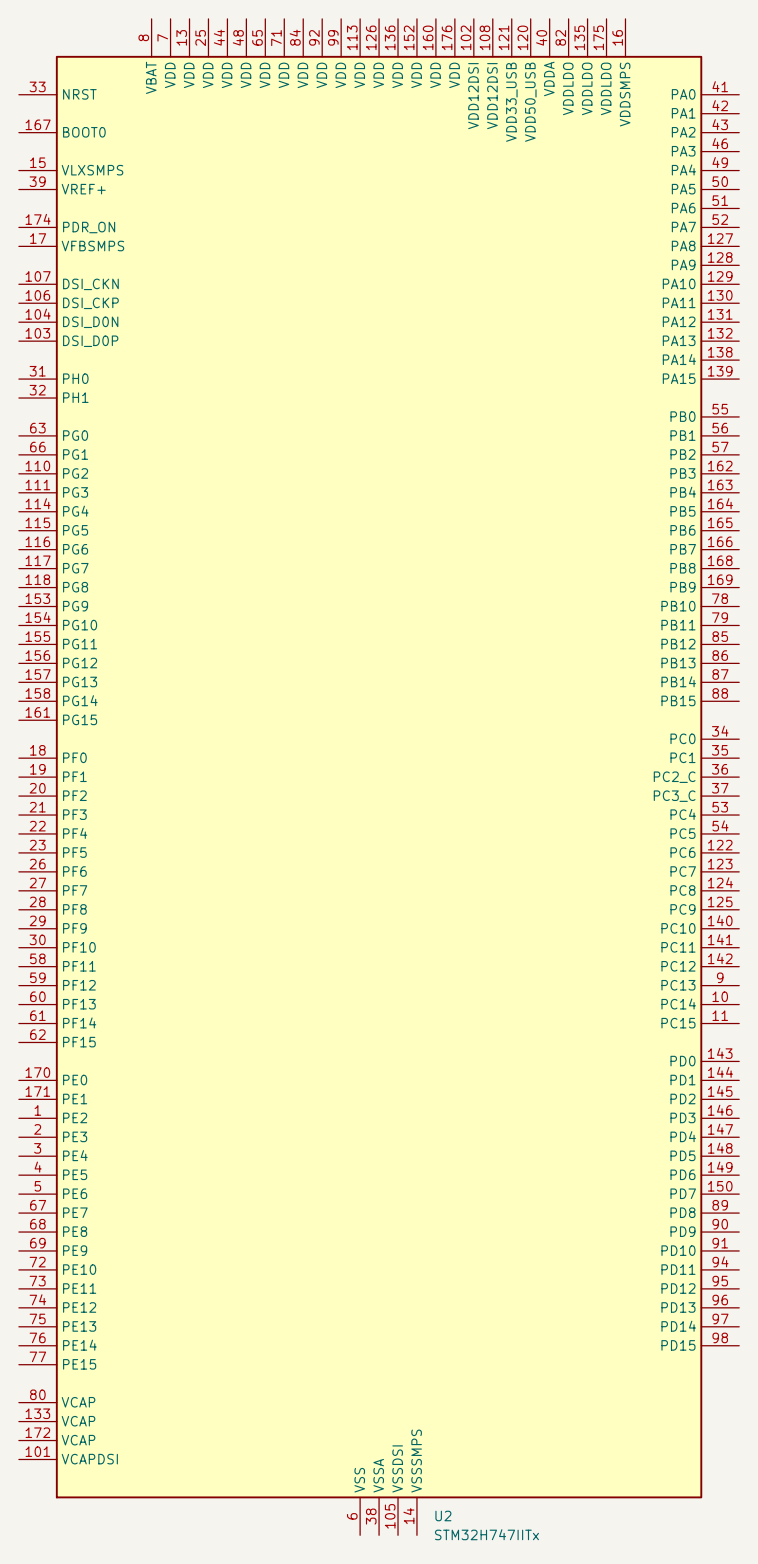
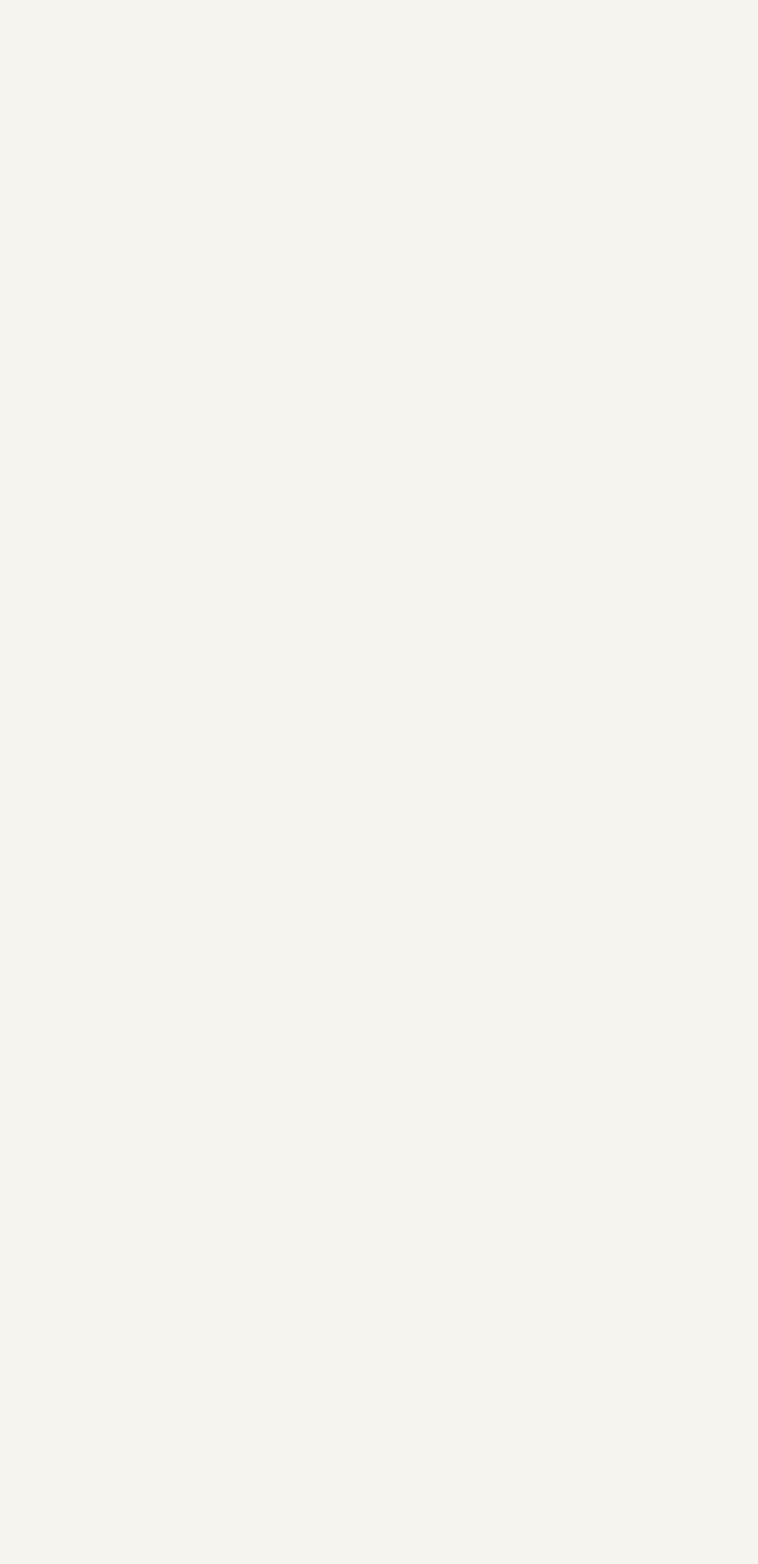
U2: STM32H747IITx (379, 777) -> none

